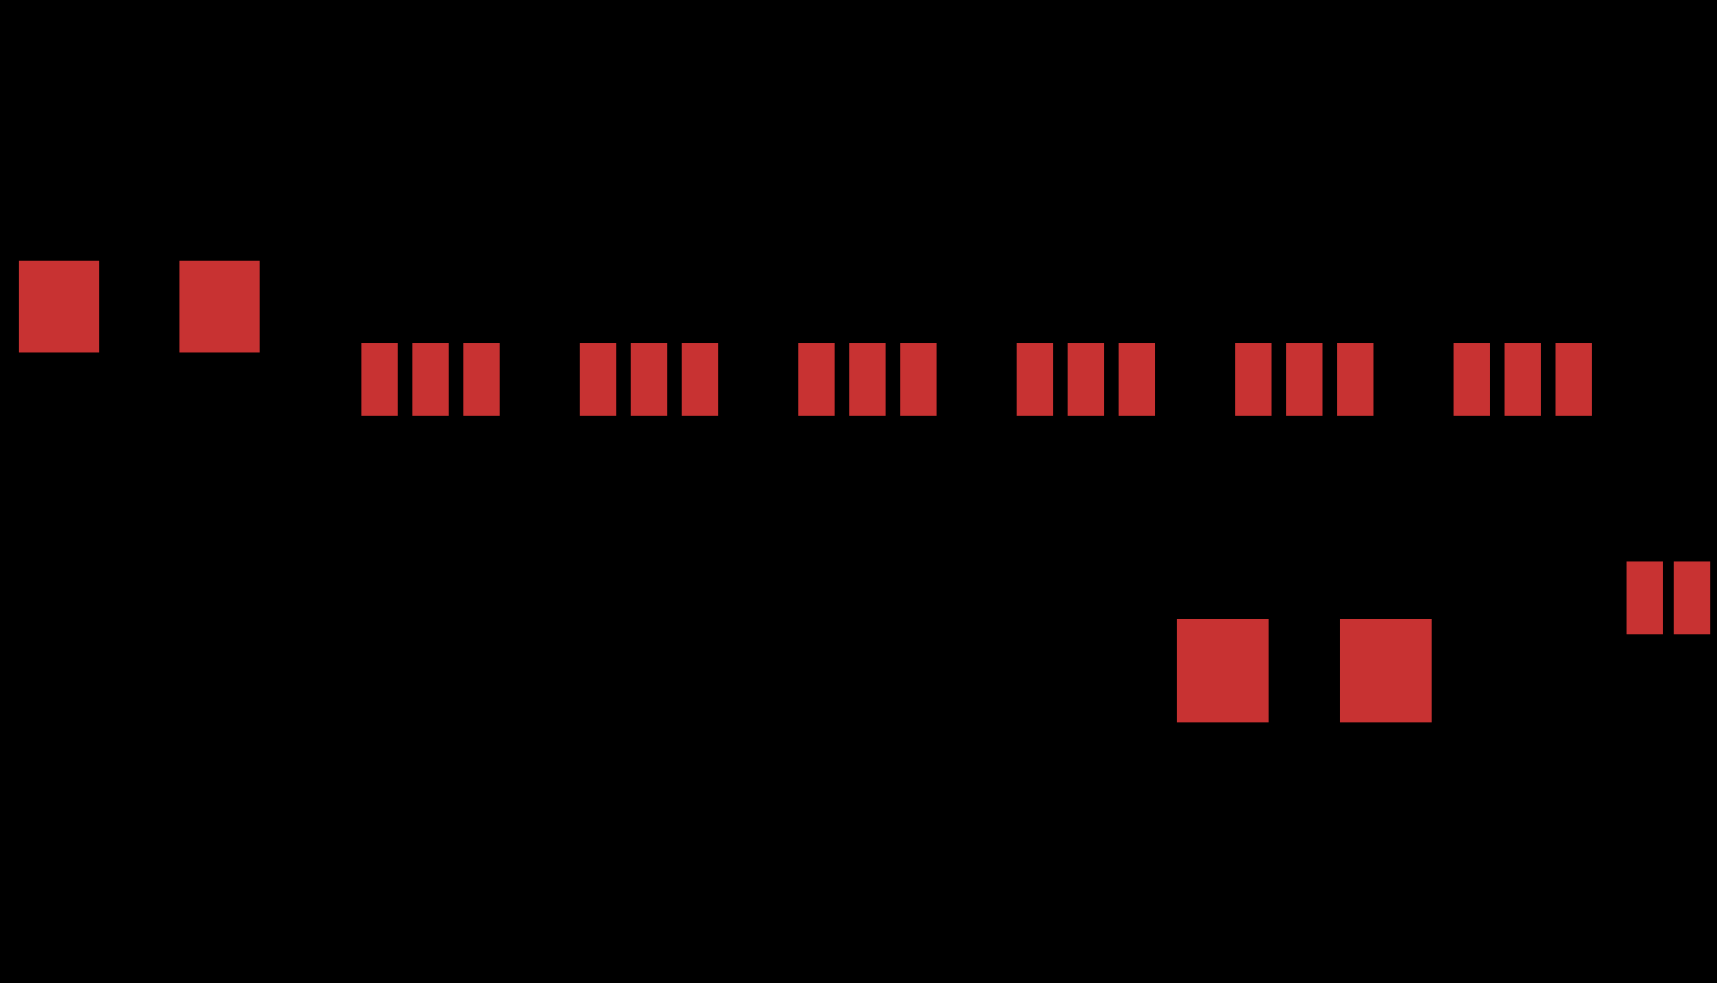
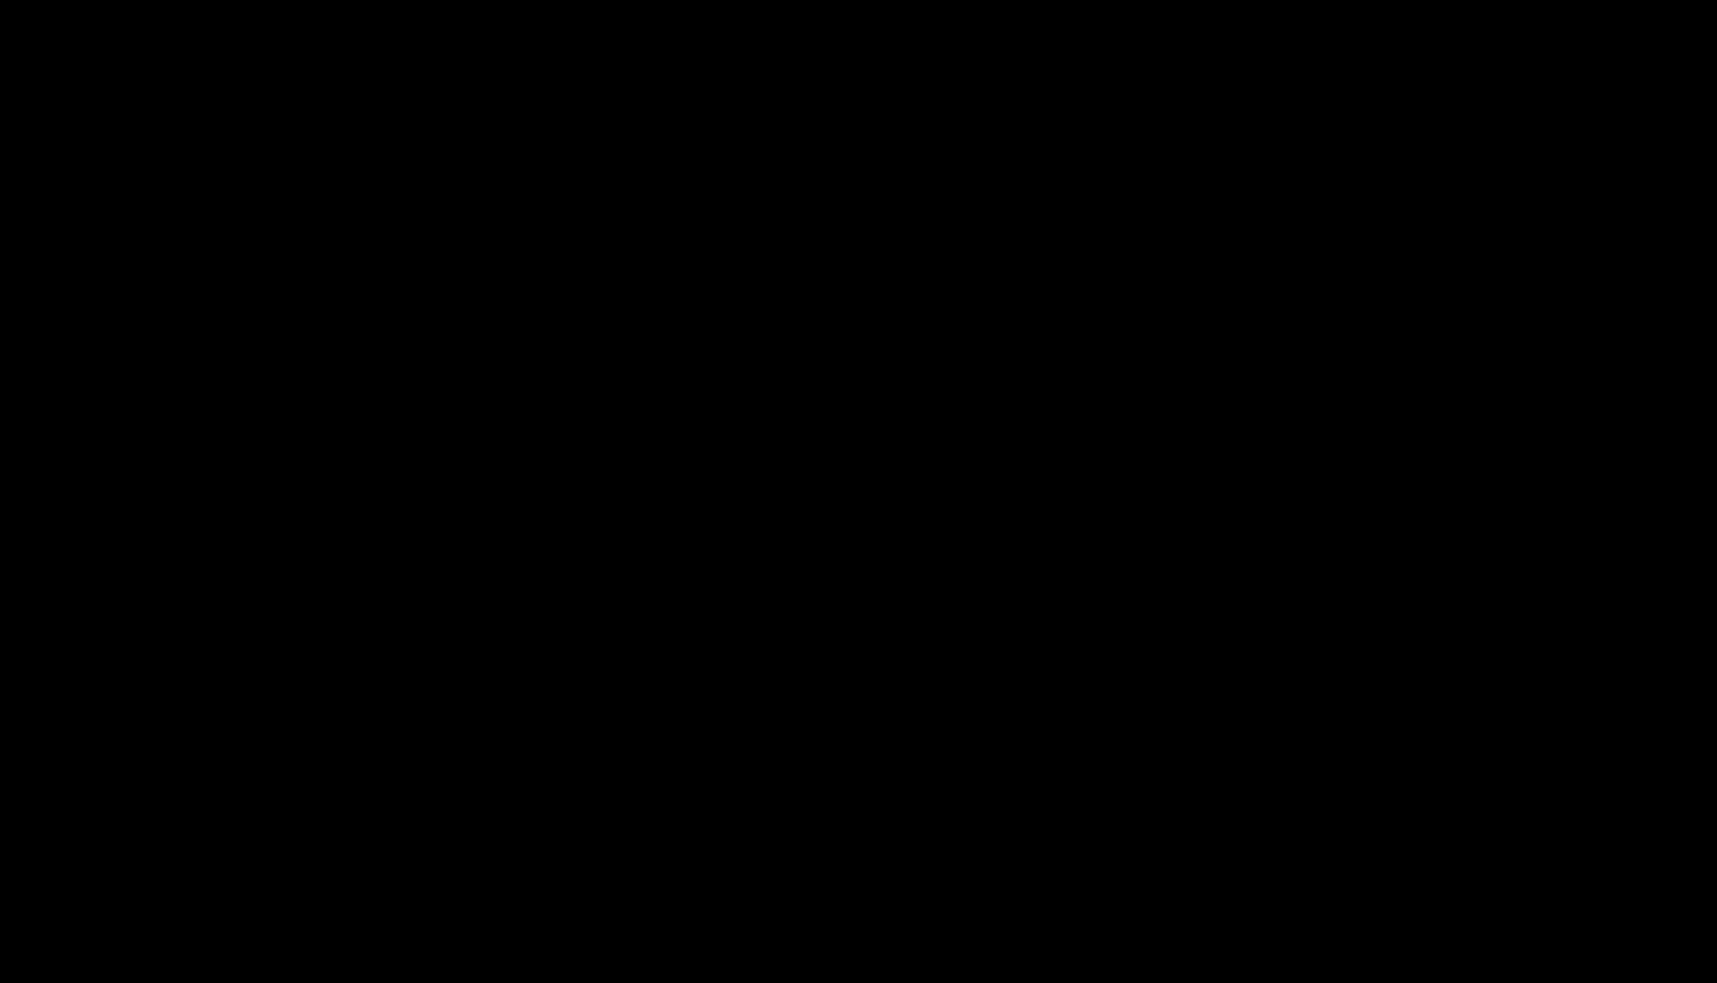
part: (139, 306) -> none
part: (430, 379) -> none
part: (648, 379) -> none
part: (867, 379) -> none
part: (1085, 379) -> none
part: (1304, 379) -> none
part: (1522, 379) -> none
part: (1668, 597) -> none
part: (1304, 670) -> none

